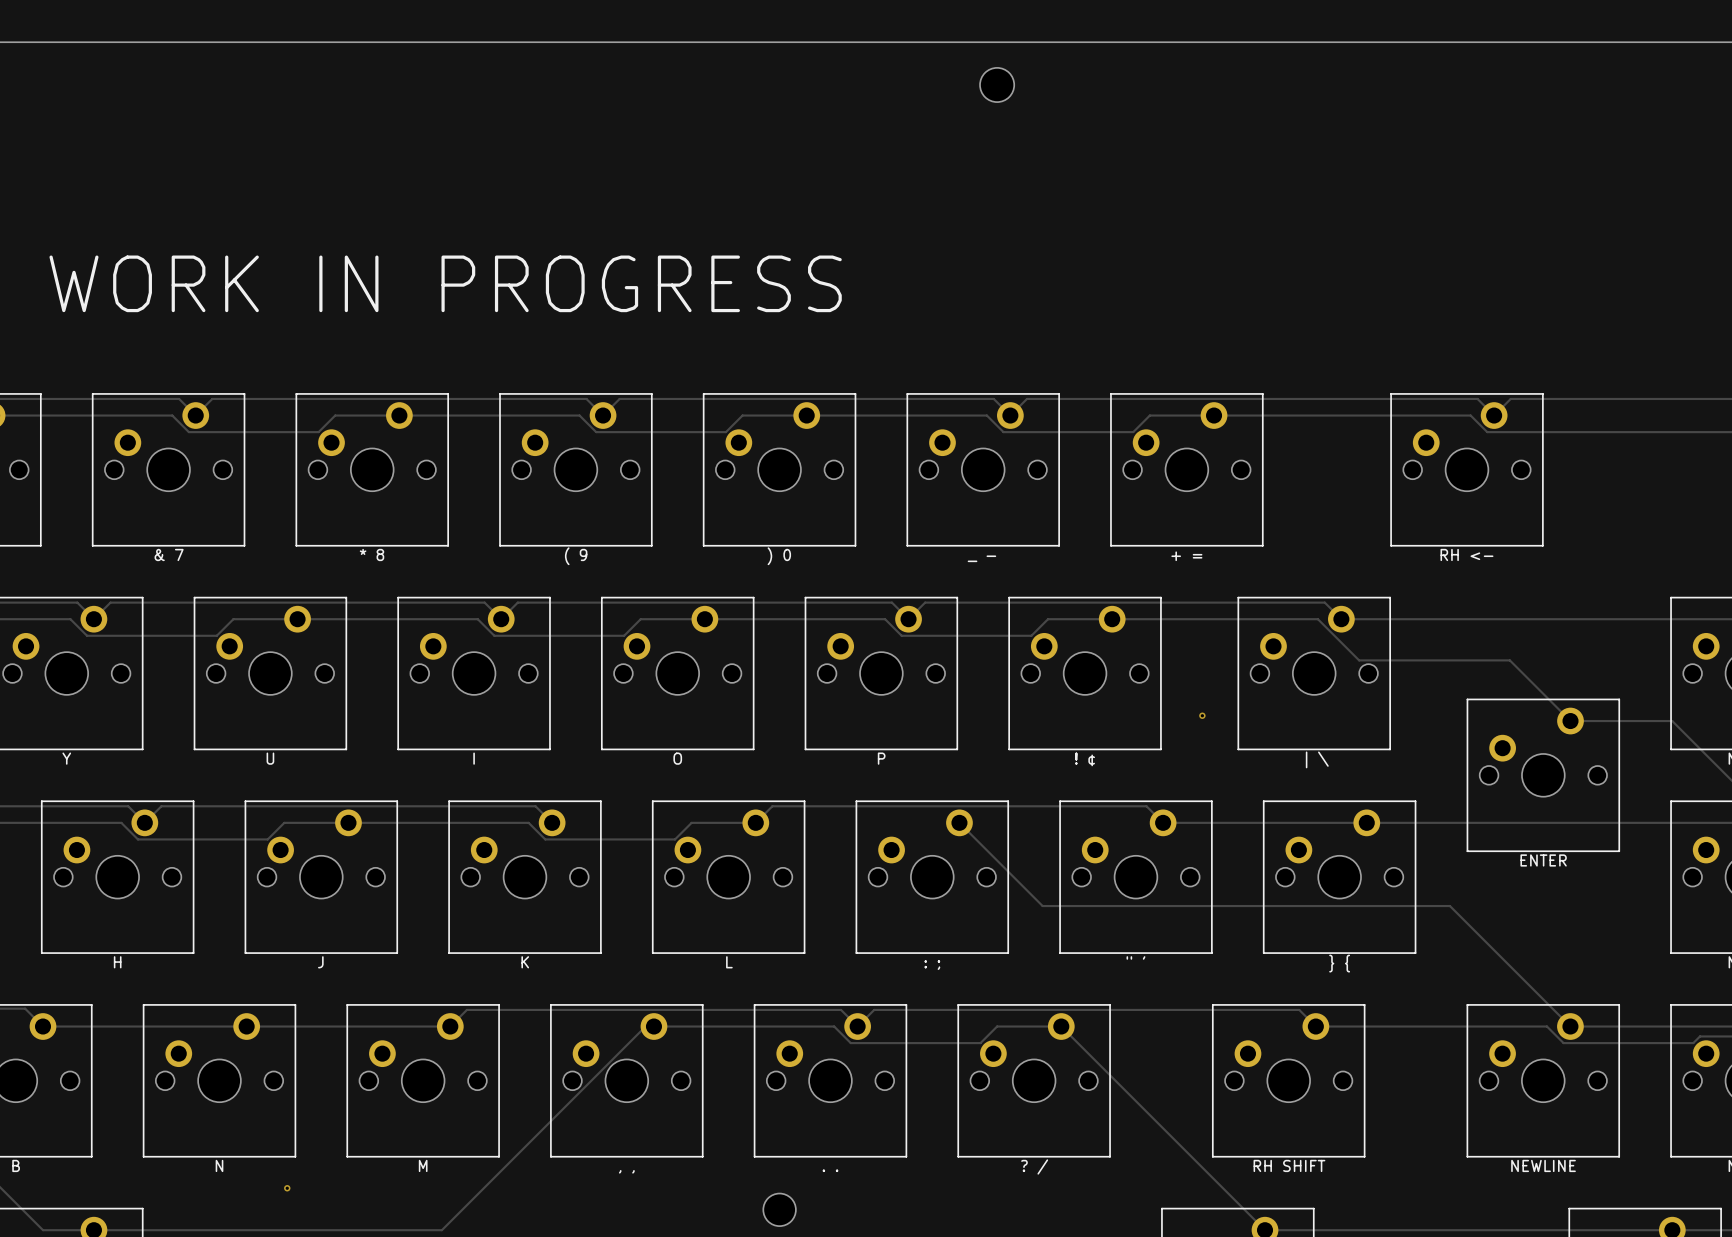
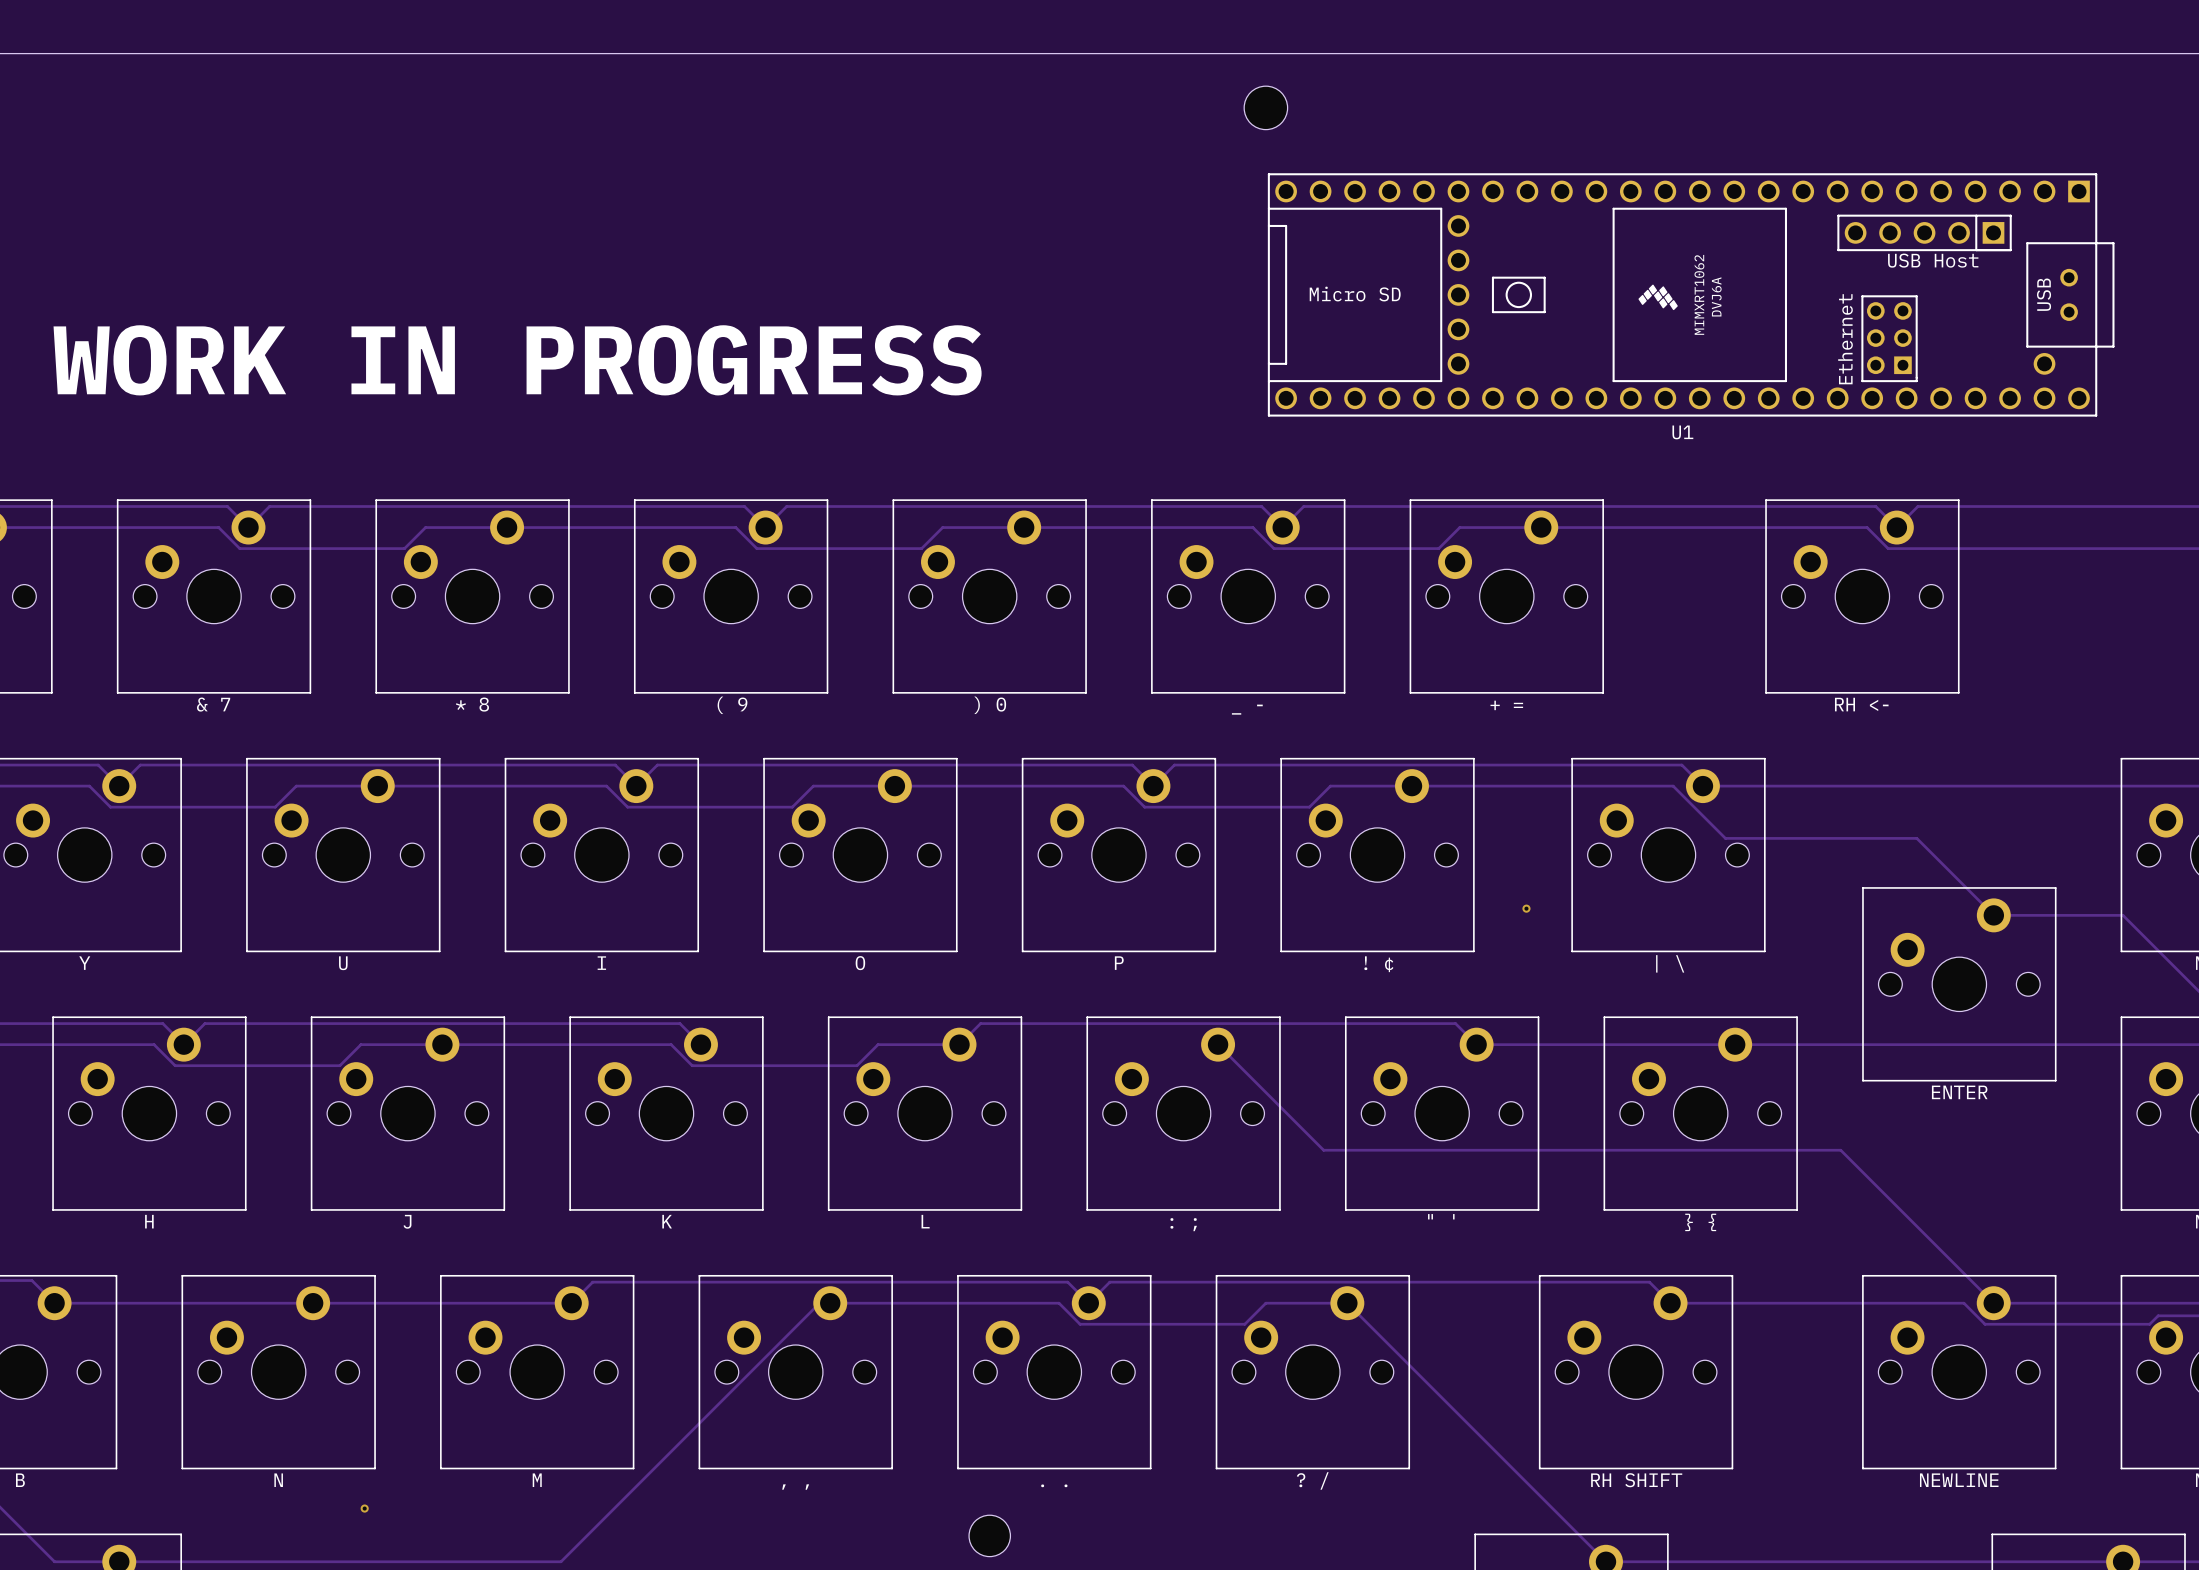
U1: none -> (1691, 294)

